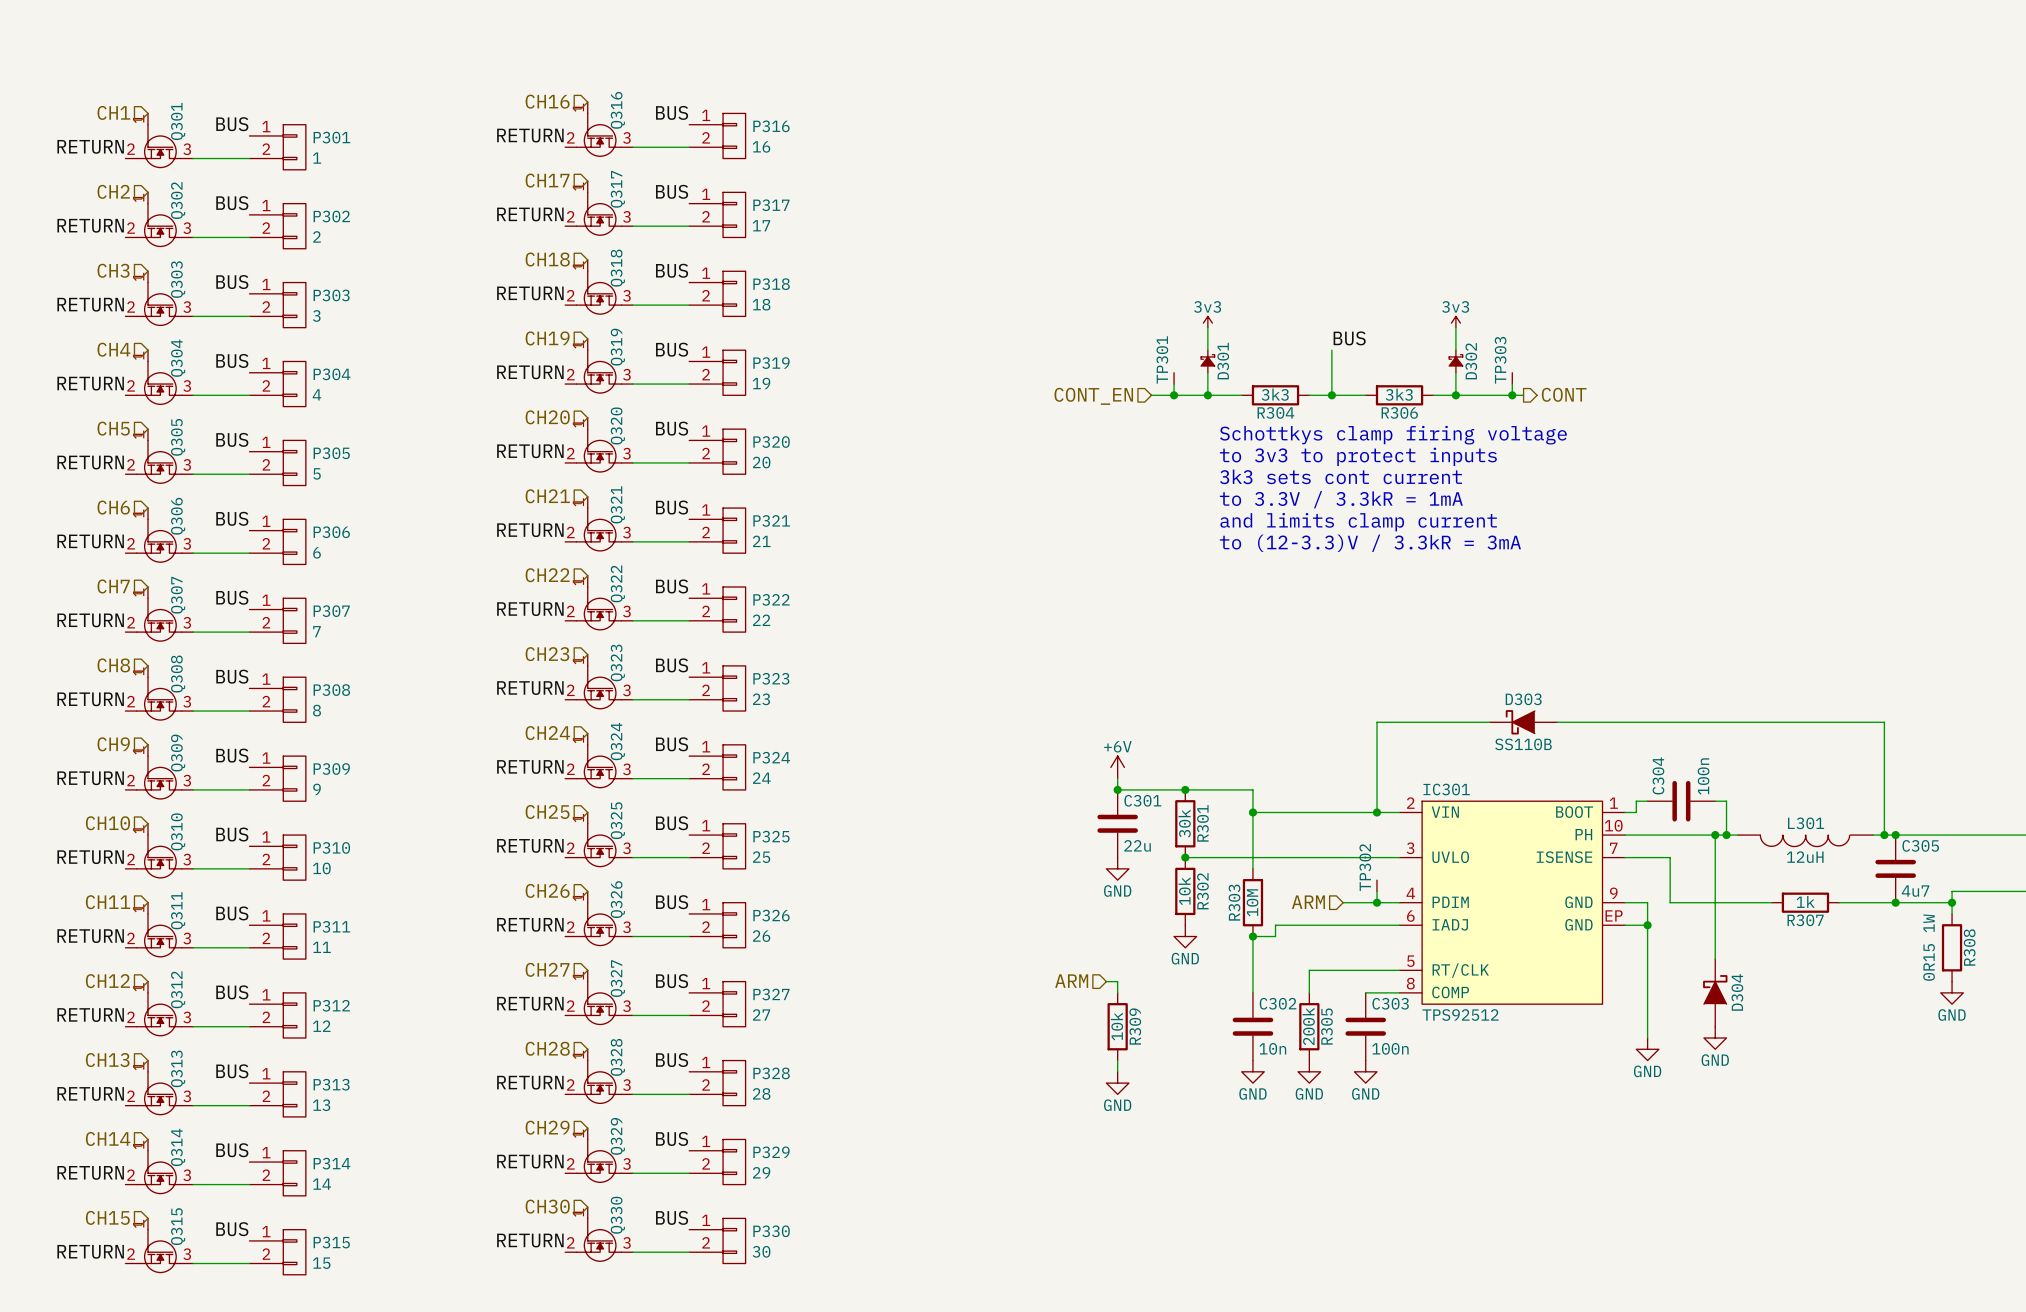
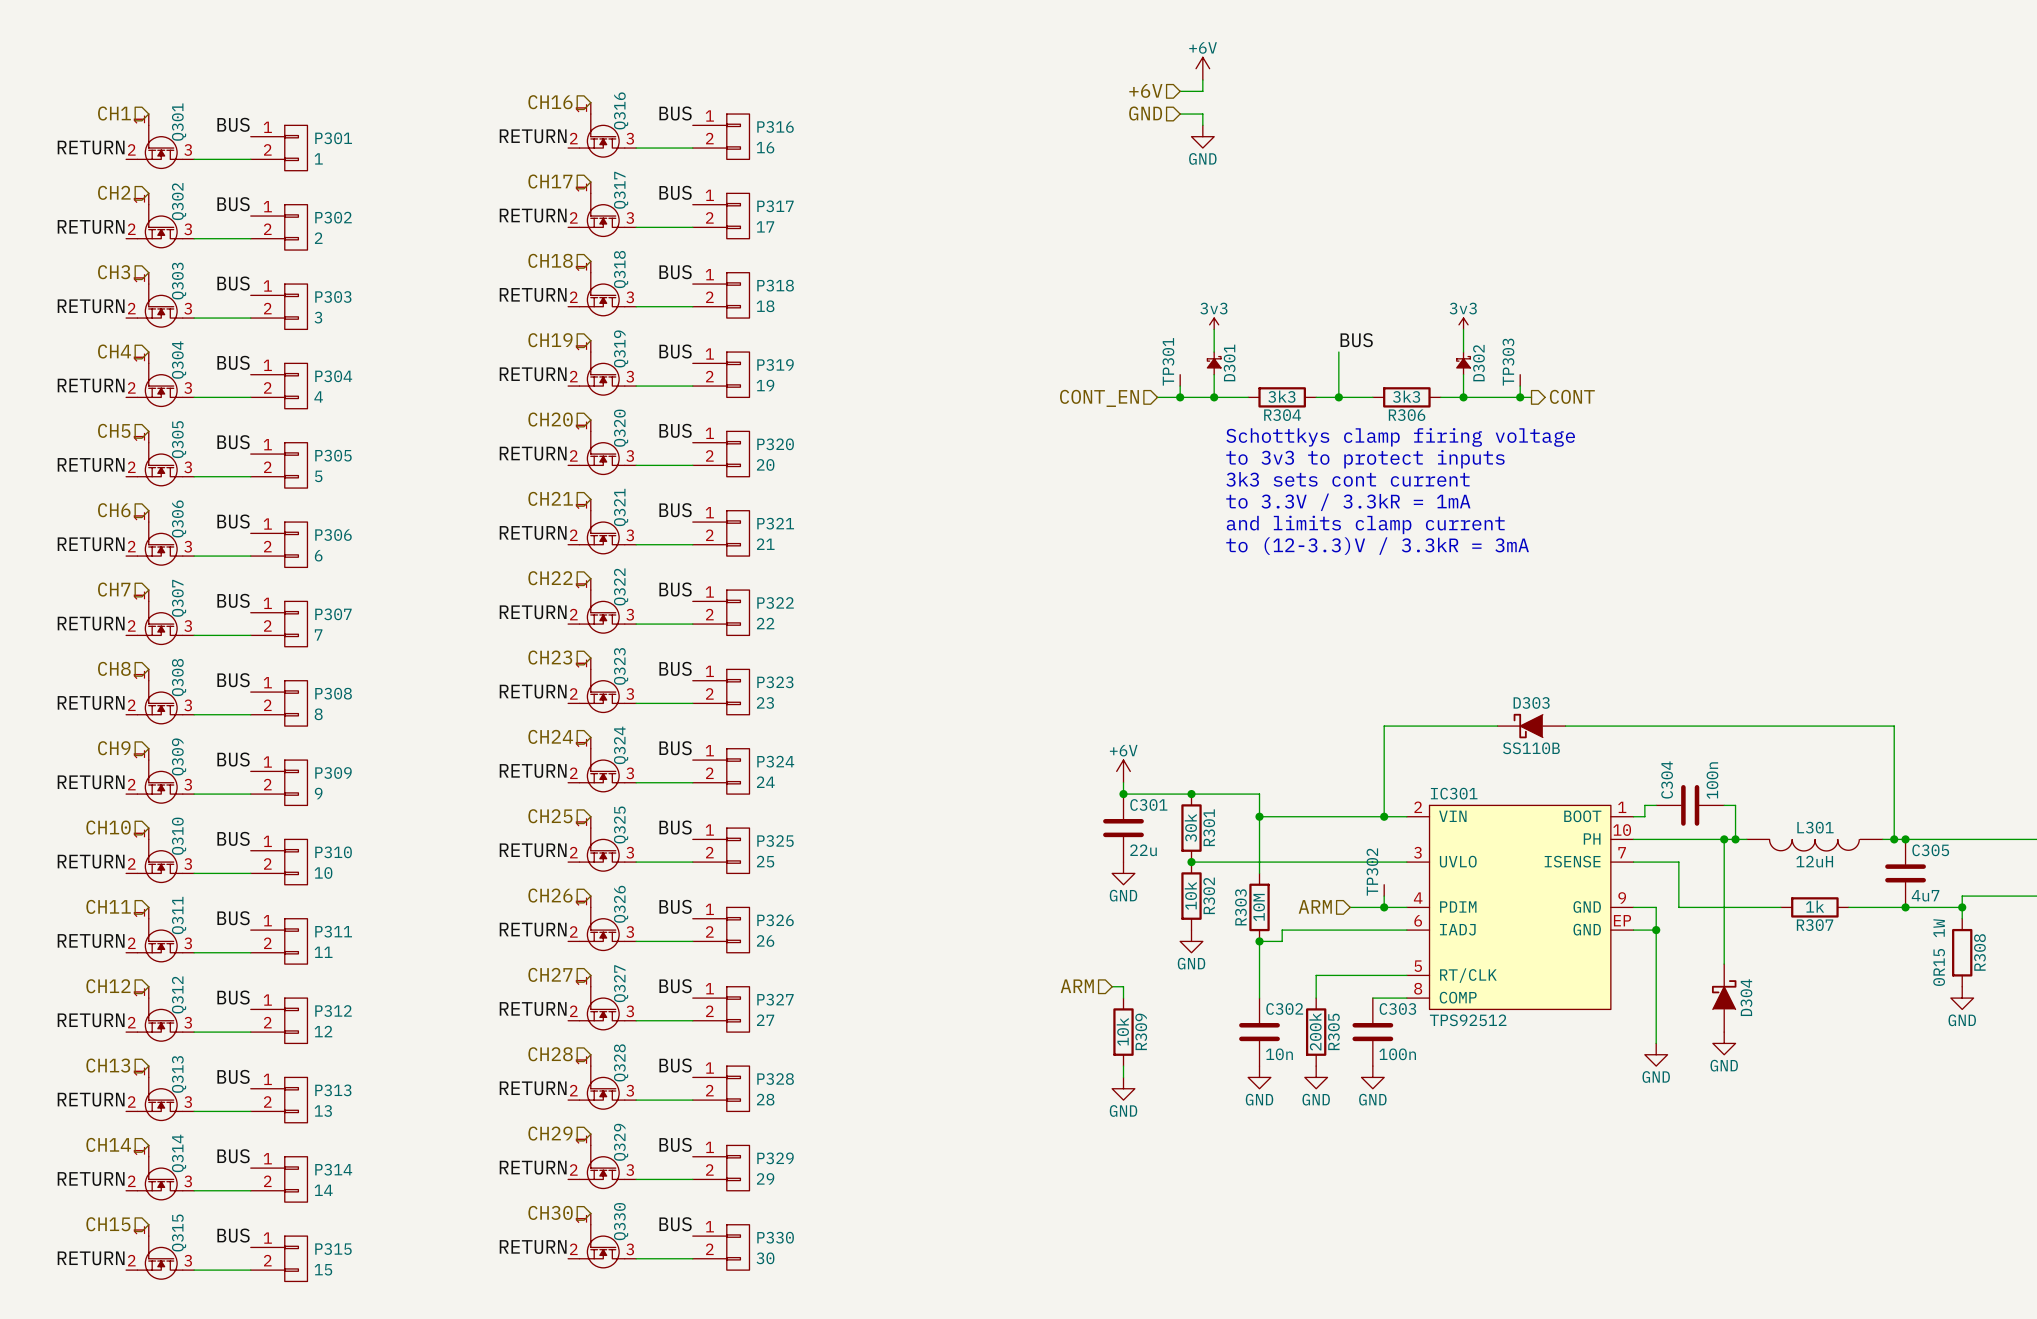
power symbol: none -> +6V (1202, 68)
wire: none -> (1202, 80) (1202, 91) (1180, 91)
hierarchical label: none -> +6V (1145, 90)
hierarchical label: none -> GND (1145, 113)
wire: none -> (1180, 114) (1202, 114) (1202, 125)
power symbol: none -> GND (1202, 136)

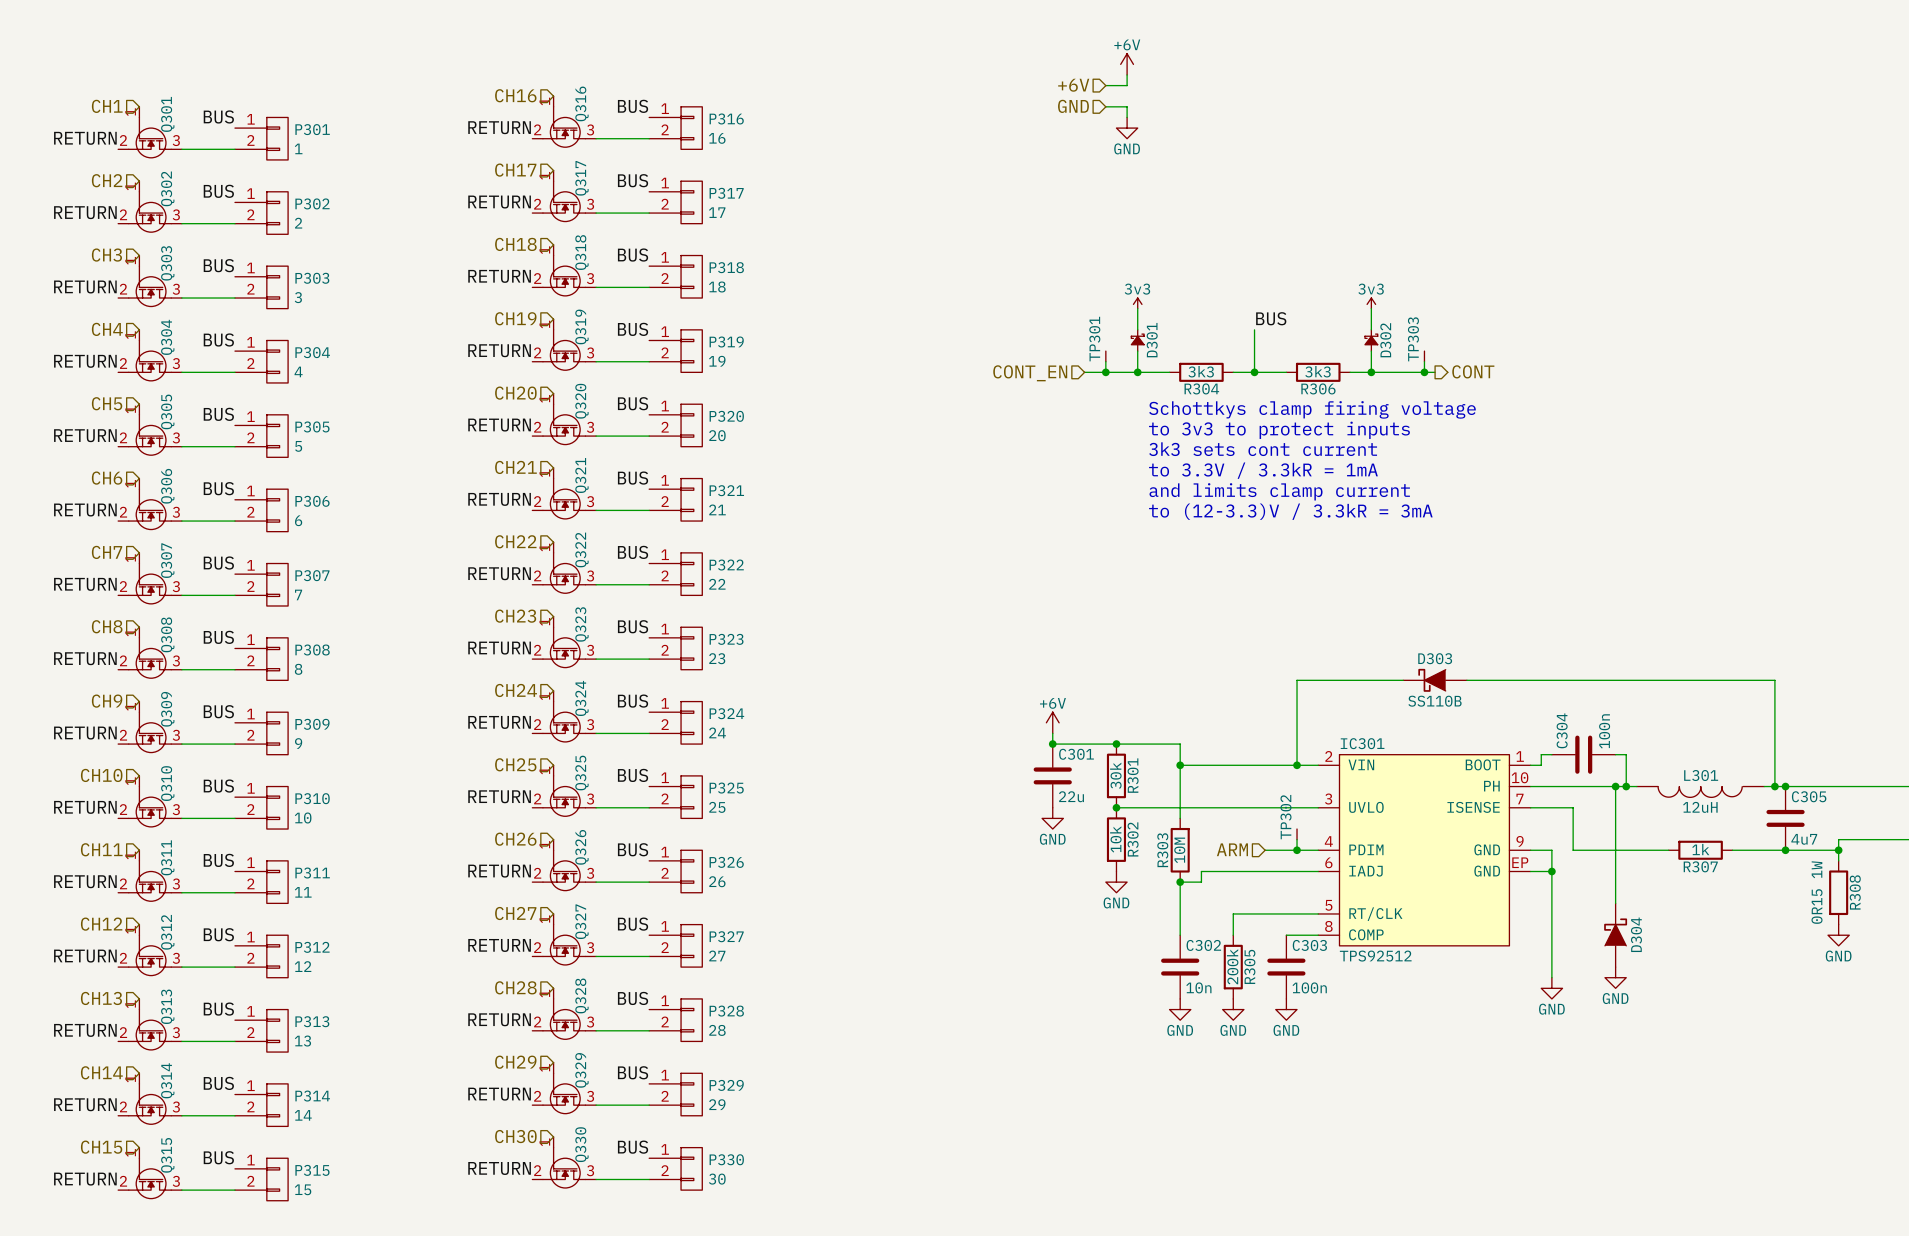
hierarchical label: ARM (1077, 986) -> none
wire: (1112, 986) (1123, 986) (1123, 998) -> none
R309: 10k (1123, 1032) -> none
wire: (1123, 1066) (1123, 1077) -> none
power symbol: GND (1123, 1088) -> none

